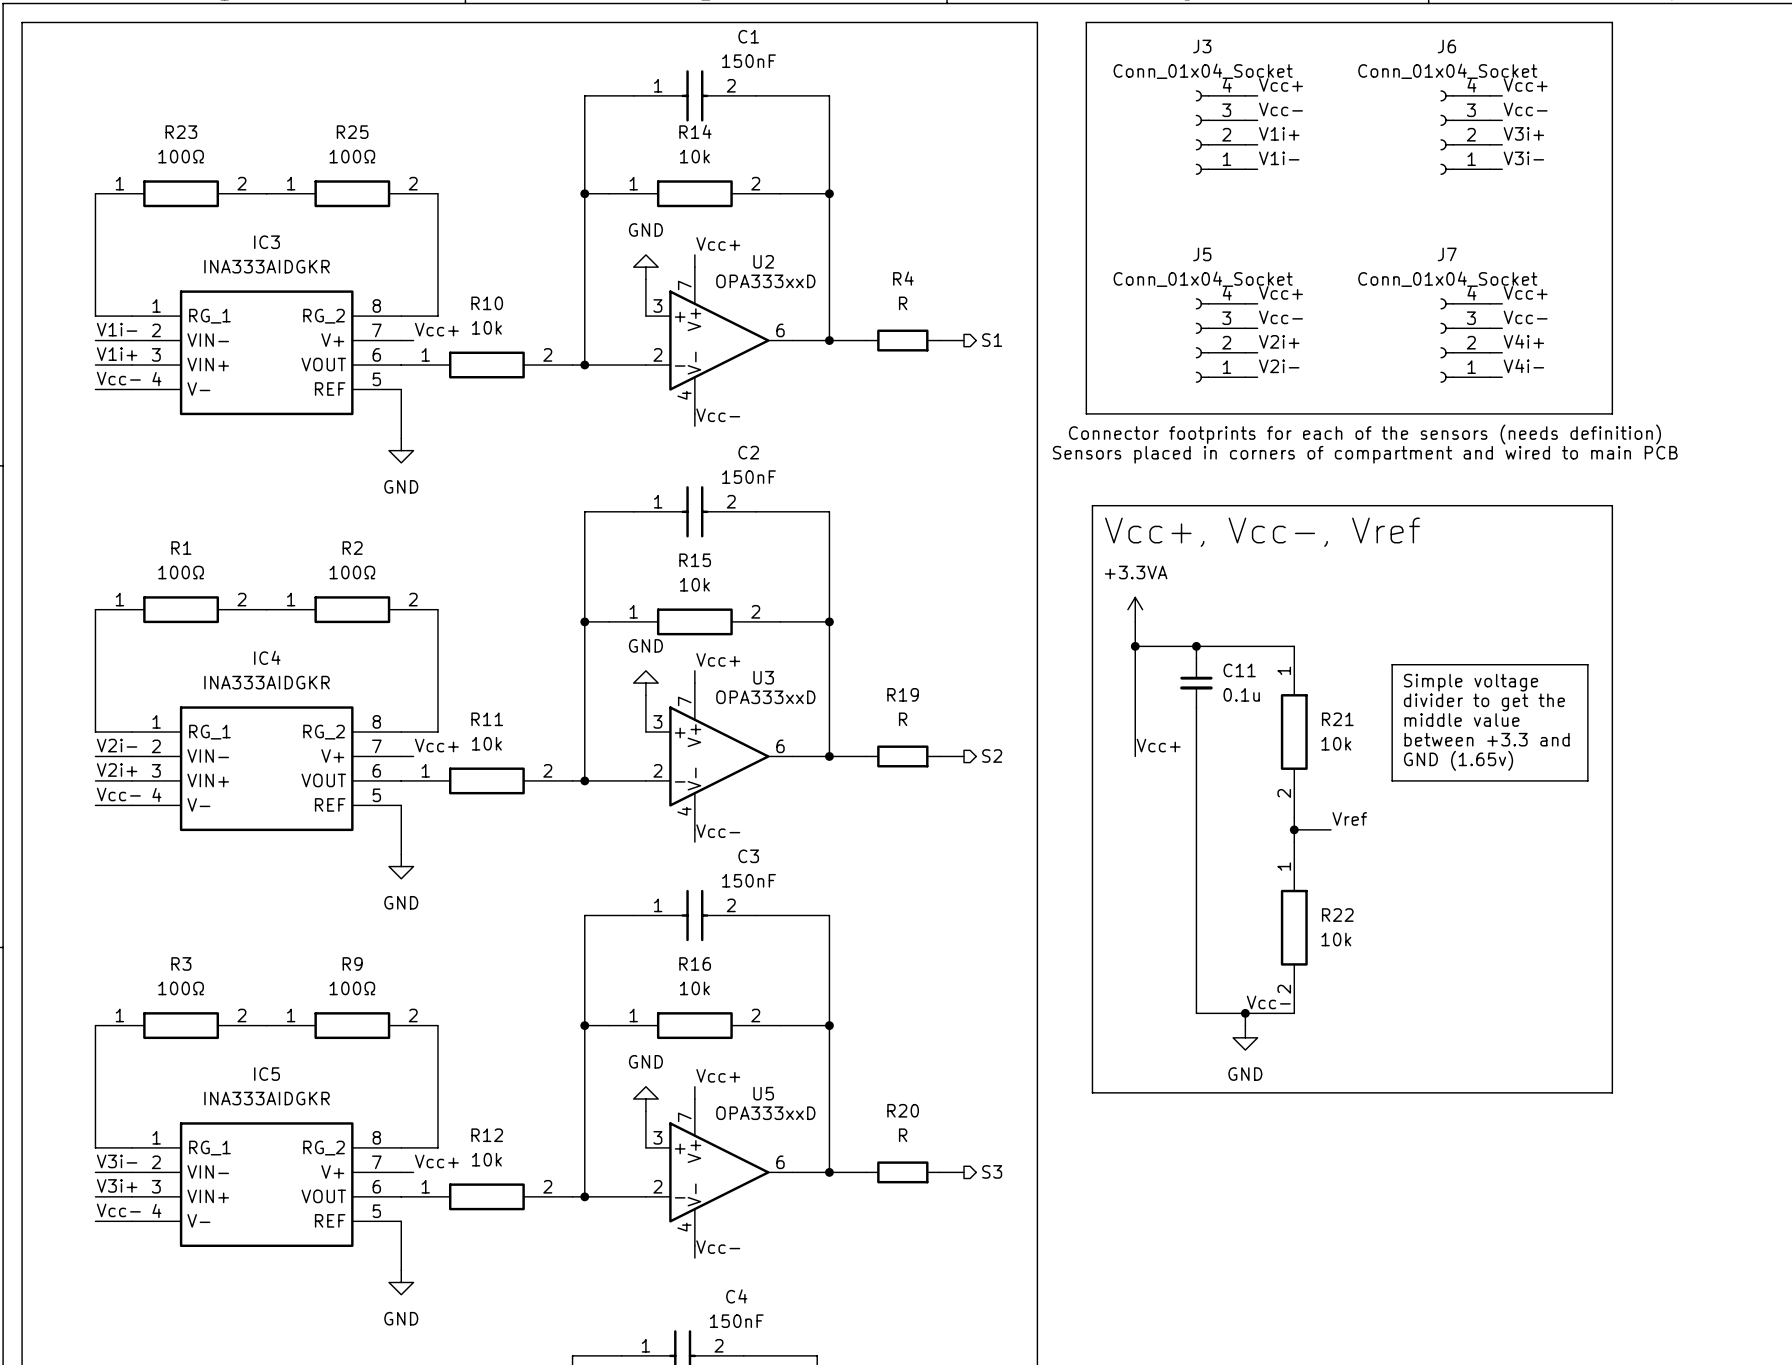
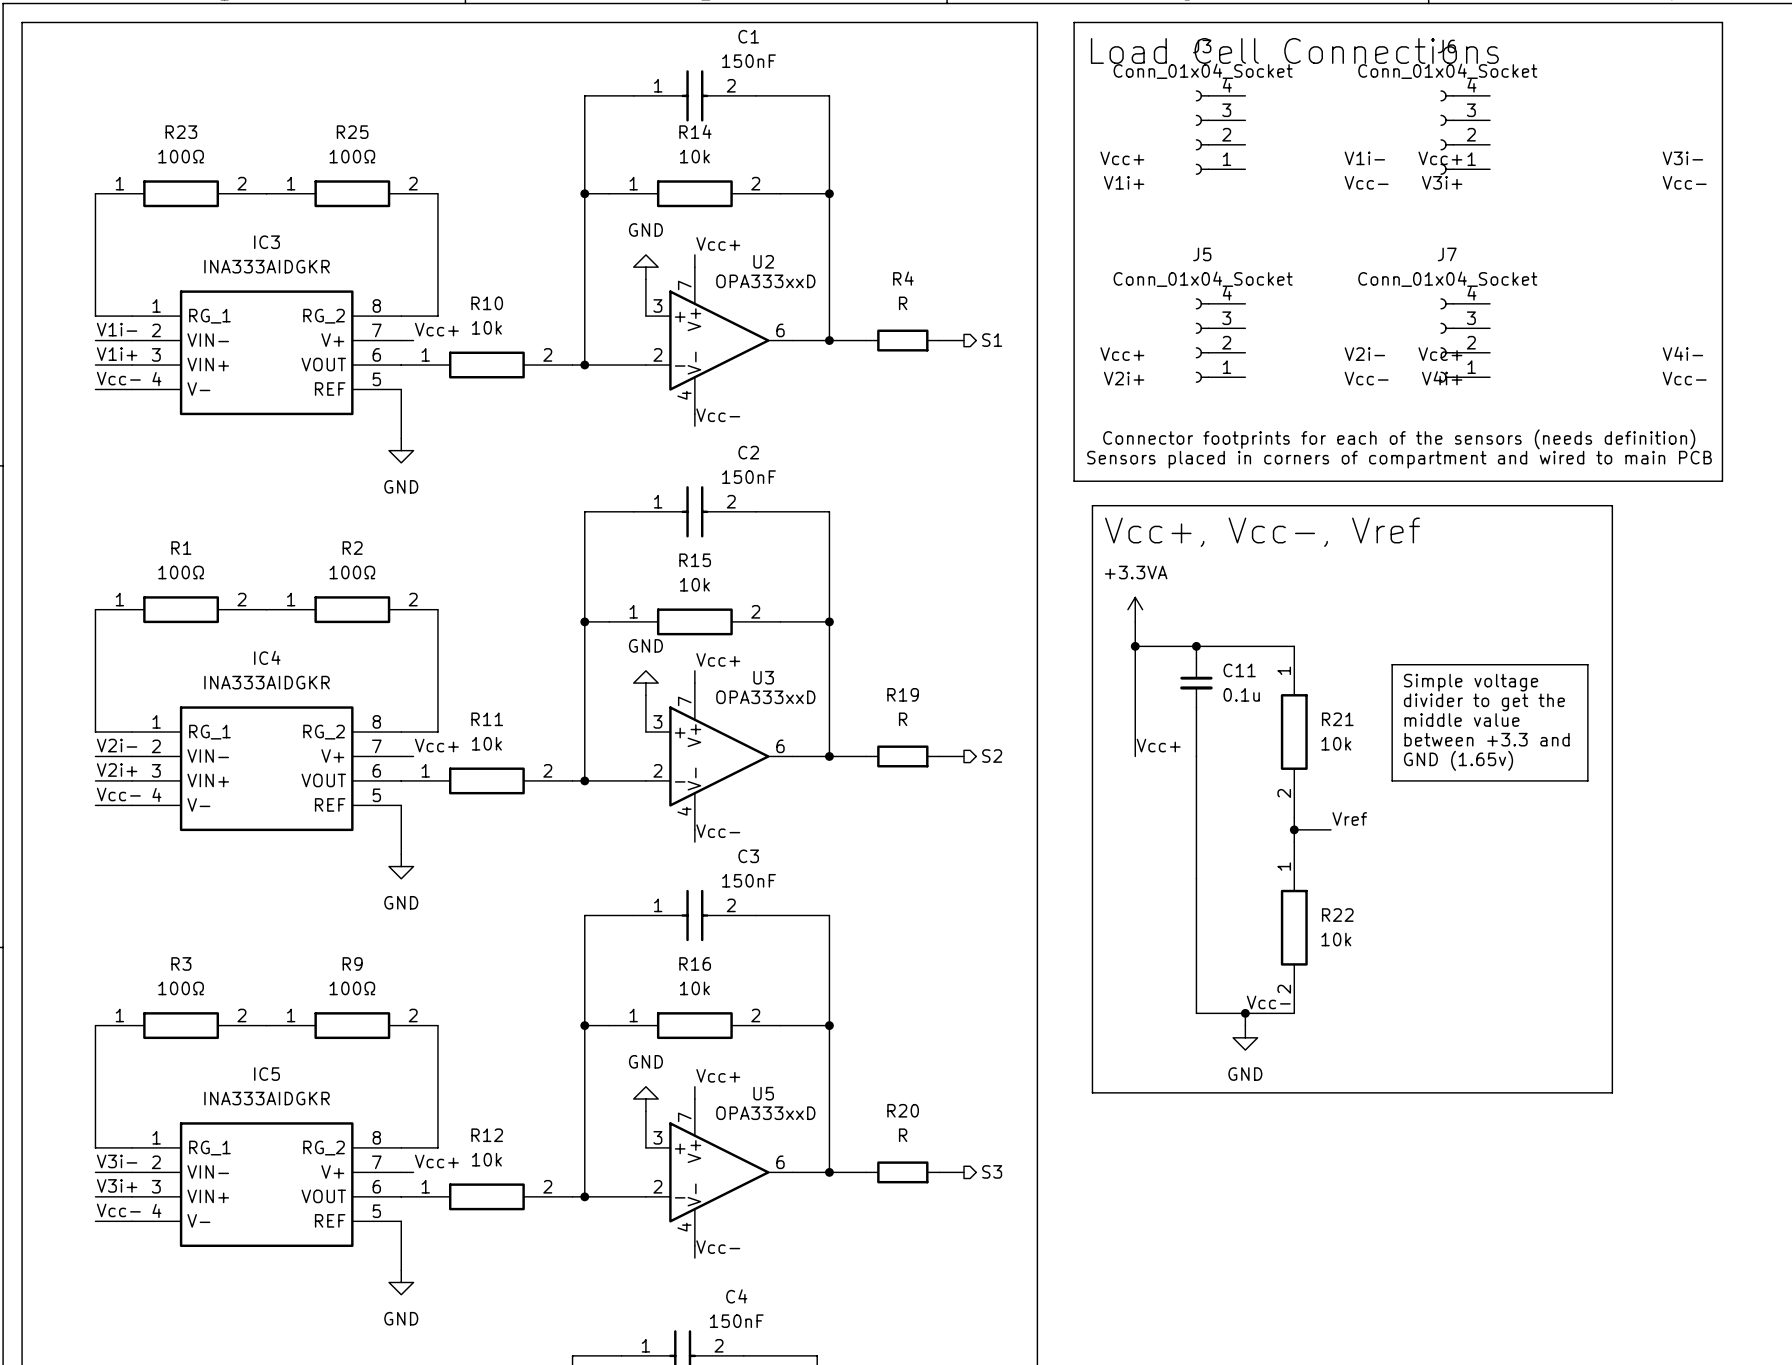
line: (1086, 22) (1086, 413) (1612, 413) (1612, 22) -> (1086, 22) (1074, 22) (1074, 481) (1722, 481) (1722, 22) (1612, 22)
text: none -> Load Cell Connections (1294, 50)
label: Vcc+ (1280, 84) -> none
label: Vcc+ (1525, 84) -> none
wire: (1245, 95) (1257, 95) -> none
wire: (1490, 95) (1502, 95) -> none
label: Vcc- (1280, 109) -> none
label: Vcc- (1525, 109) -> none
wire: (1245, 120) (1257, 120) -> none
wire: (1490, 120) (1502, 120) -> none
label position: V1i+ (1279, 133) -> V1i+ (1124, 182)
label position: V3i+ (1523, 133) -> V3i+ (1442, 182)
wire: (1245, 144) (1257, 144) -> none
wire: (1490, 144) (1502, 144) -> none
label: none -> Vcc+ (1122, 158)
label position: V1i- (1279, 158) -> V1i- (1364, 158)
label: none -> Vcc+ (1440, 158)
label position: V3i- (1523, 158) -> V3i- (1682, 158)
wire: (1245, 169) (1257, 169) -> none
wire: (1490, 169) (1502, 169) -> none
label: none -> Vcc- (1366, 182)
label: none -> Vcc- (1684, 182)
label: Vcc+ (1280, 292) -> none
label: Vcc+ (1525, 292) -> none
wire: (1245, 303) (1257, 303) -> none
wire: (1490, 303) (1502, 303) -> none
label: Vcc- (1280, 317) -> none
label: Vcc- (1525, 317) -> none
wire: (1245, 328) (1257, 328) -> none
wire: (1490, 328) (1502, 328) -> none
label position: V2i+ (1279, 341) -> V2i+ (1124, 378)
label position: V4i+ (1523, 341) -> V4i+ (1442, 378)
wire: (1245, 352) (1257, 352) -> none
wire: (1490, 352) (1502, 352) -> none
label: none -> Vcc+ (1122, 354)
label: none -> Vcc+ (1440, 354)
label position: V2i- (1279, 366) -> V2i- (1364, 354)
label position: V4i- (1523, 366) -> V4i- (1682, 353)
wire: (1245, 377) (1257, 377) -> none
wire: (1490, 377) (1502, 377) -> none
label: none -> Vcc- (1366, 378)
label: none -> Vcc- (1684, 378)
text position: Connector footprints for each of the sensors (needs definition) (1364, 434) -> Connector footprints for each of the sensors (needs definition) (1399, 439)
text position: Sensors placed in corners of compartment and wired to main PCB (1365, 454) -> Sensors placed in corners of compartment and wired to main PCB (1399, 459)

